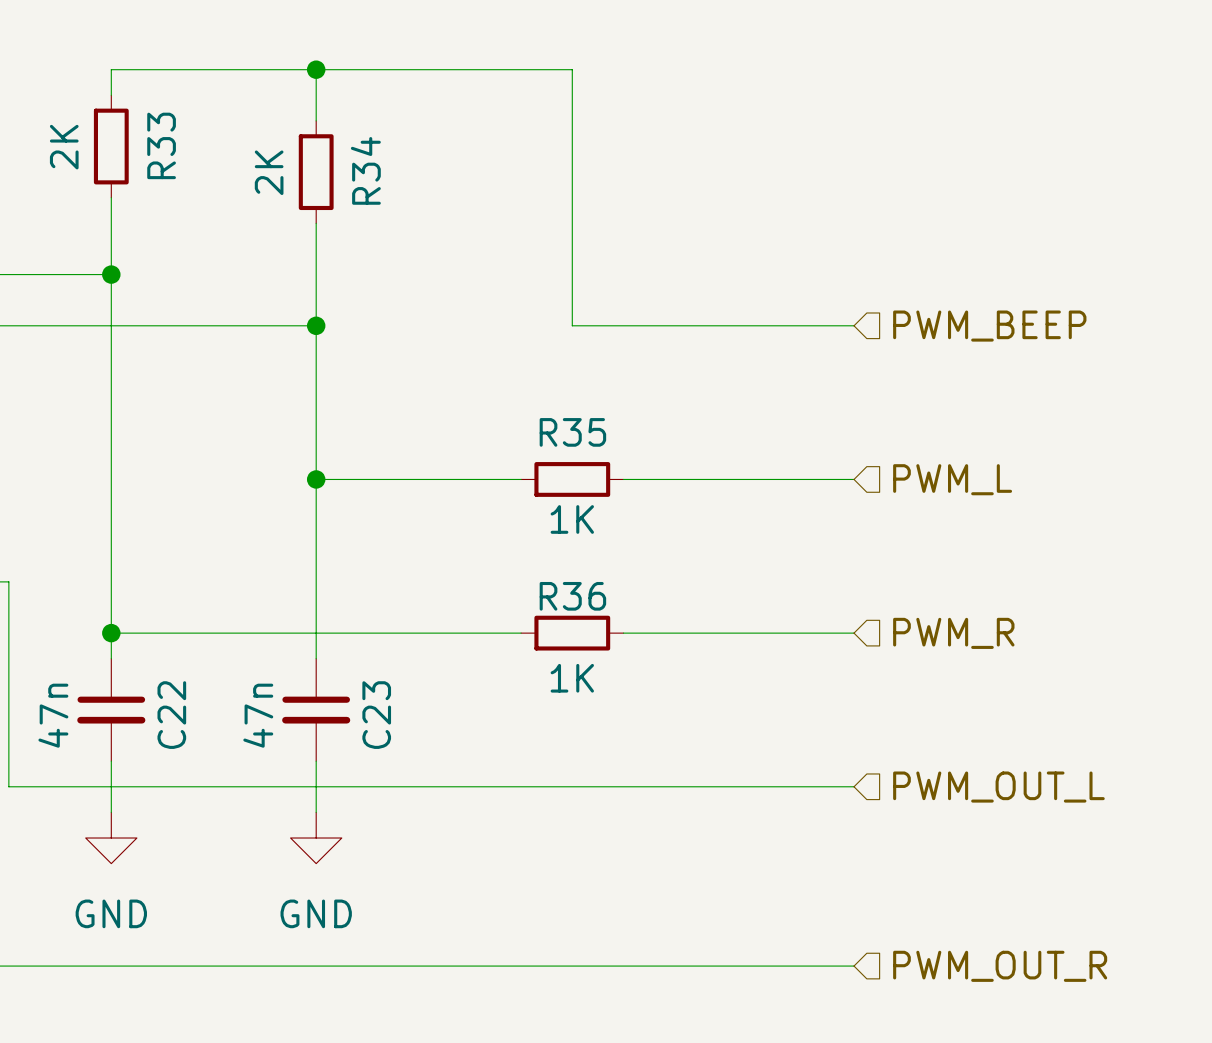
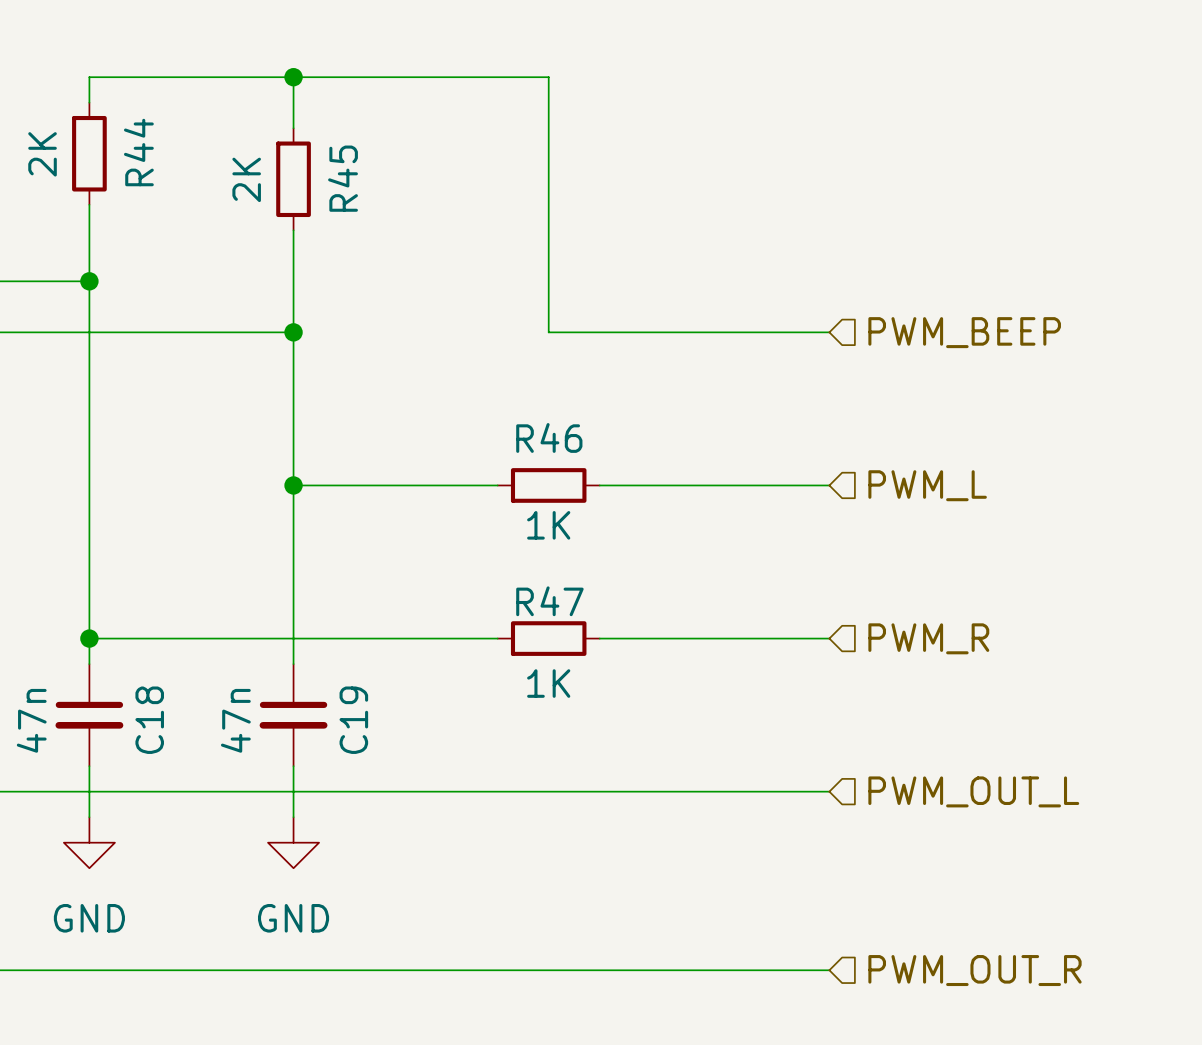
R33 name: R33 (161, 145) -> R44 (138, 152)
R34 name: R34 (365, 170) -> R45 (343, 178)
R35 name: R35 (572, 432) -> R46 (549, 437)
R36 name: R36 (572, 596) -> R47 (549, 601)
C22 name: C22 (171, 715) -> C18 (149, 720)
C23 name: C23 (376, 715) -> C19 (353, 720)

